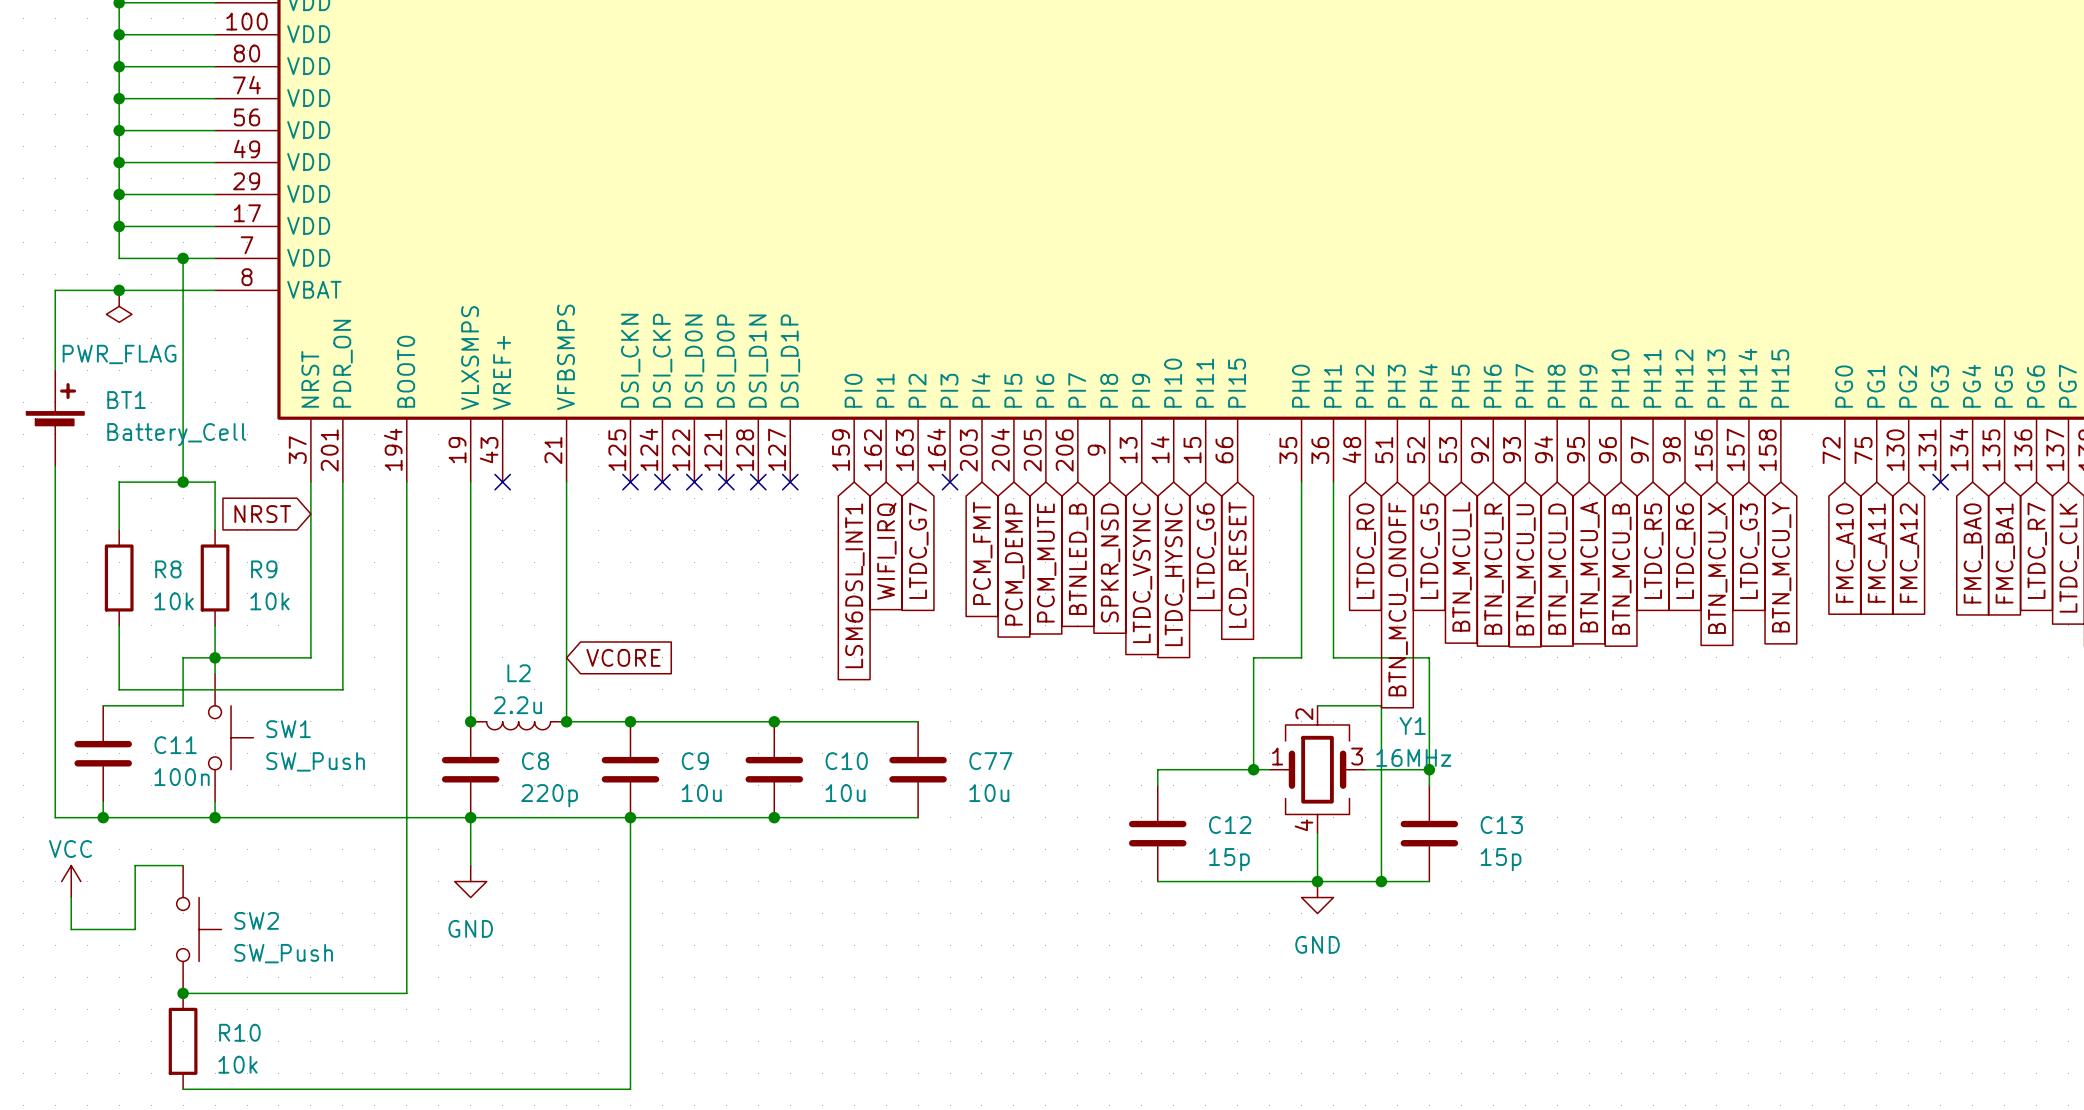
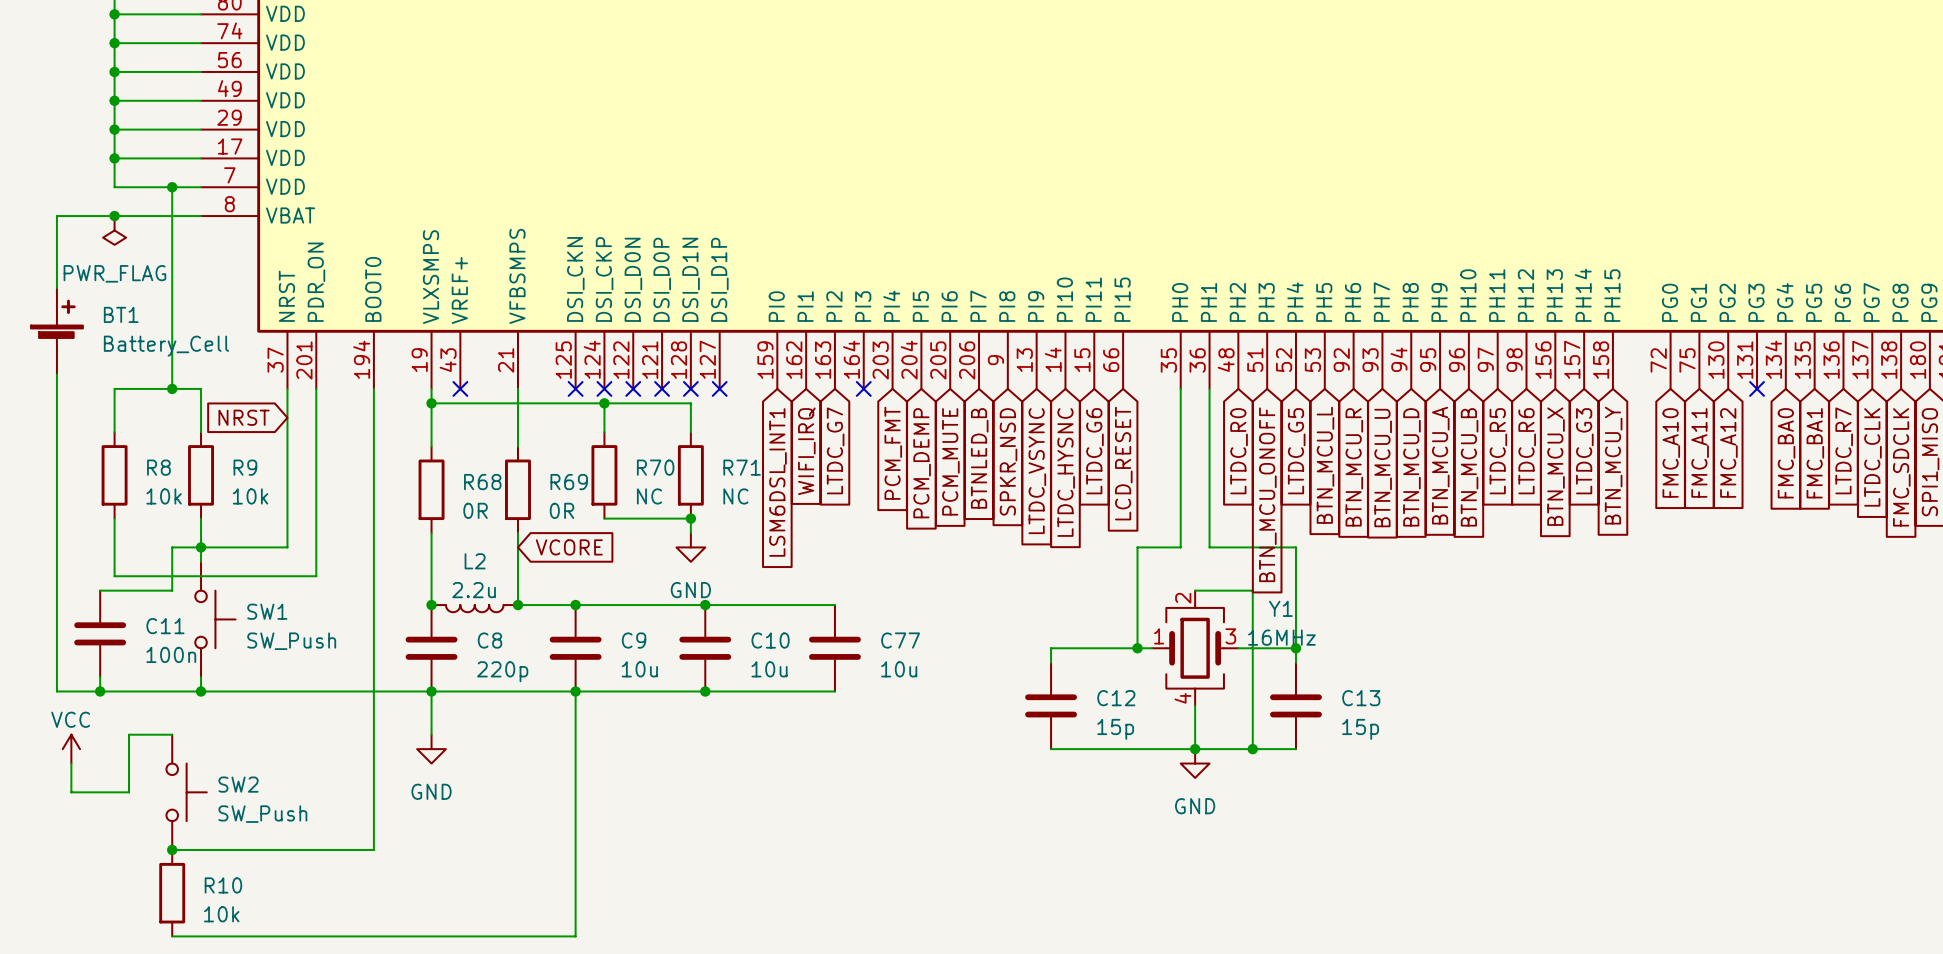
wire: none -> (431, 403) (690, 403) (690, 432)
junction: none -> (431, 403)
wire: none -> (604, 403) (604, 432)
junction: none -> (604, 403)
wire: (470, 546) (470, 641) -> none
wire: (566, 546) (566, 641) -> none
R70: none -> NC (604, 475)
R71: none -> NC (690, 475)
R68: none -> 0R (431, 489)
R69: none -> 0R (517, 489)
wire: none -> (604, 518) (690, 518) (690, 533)
junction: none -> (690, 518)
power symbol: none -> GND (690, 547)

